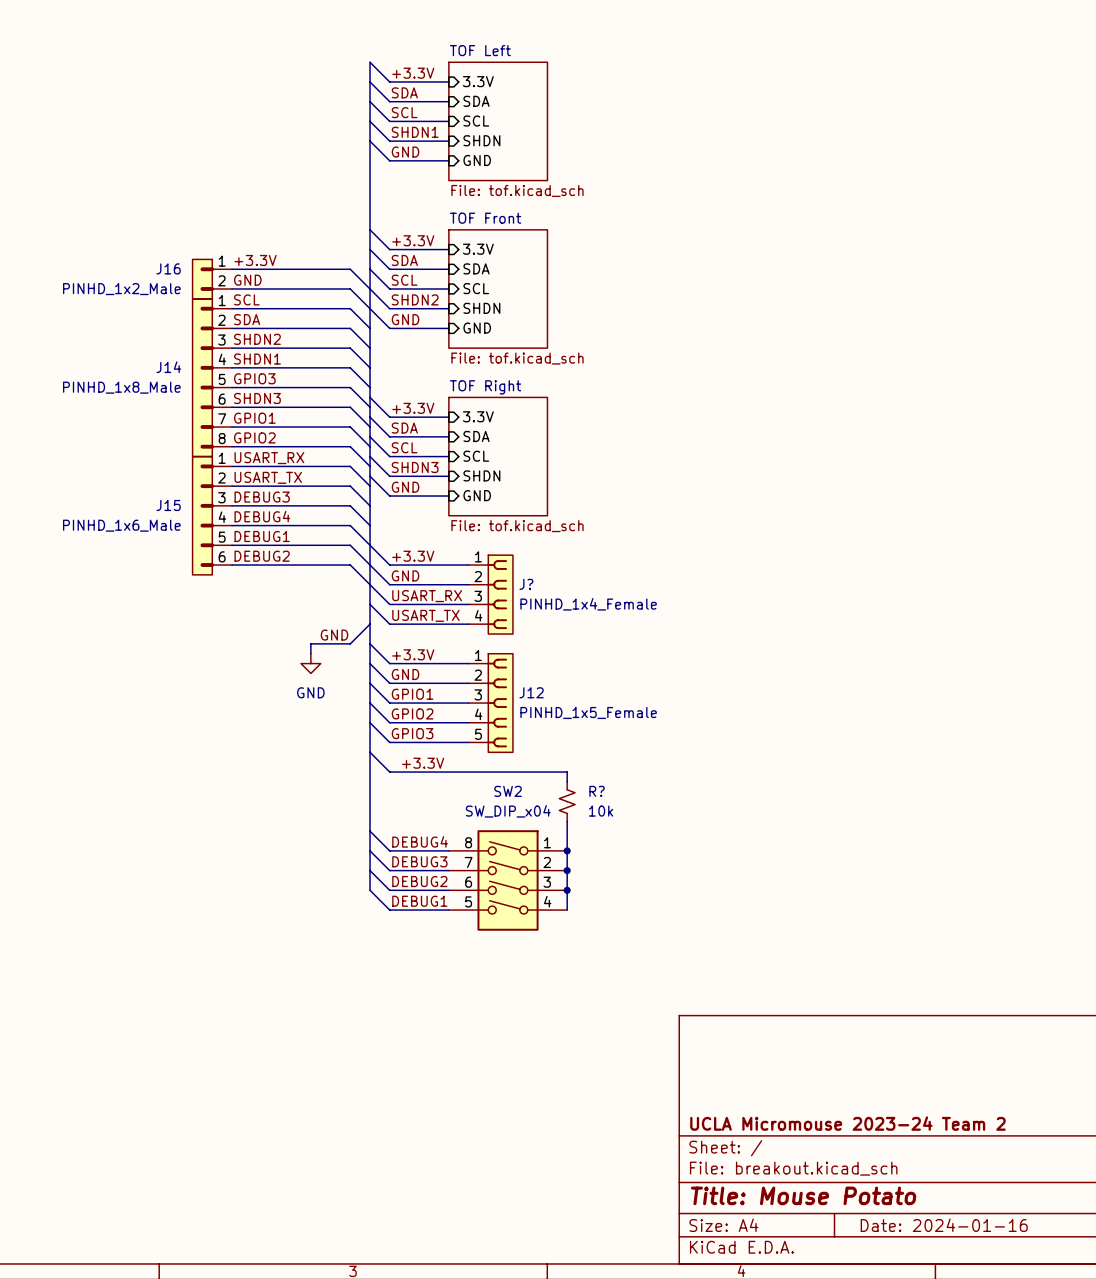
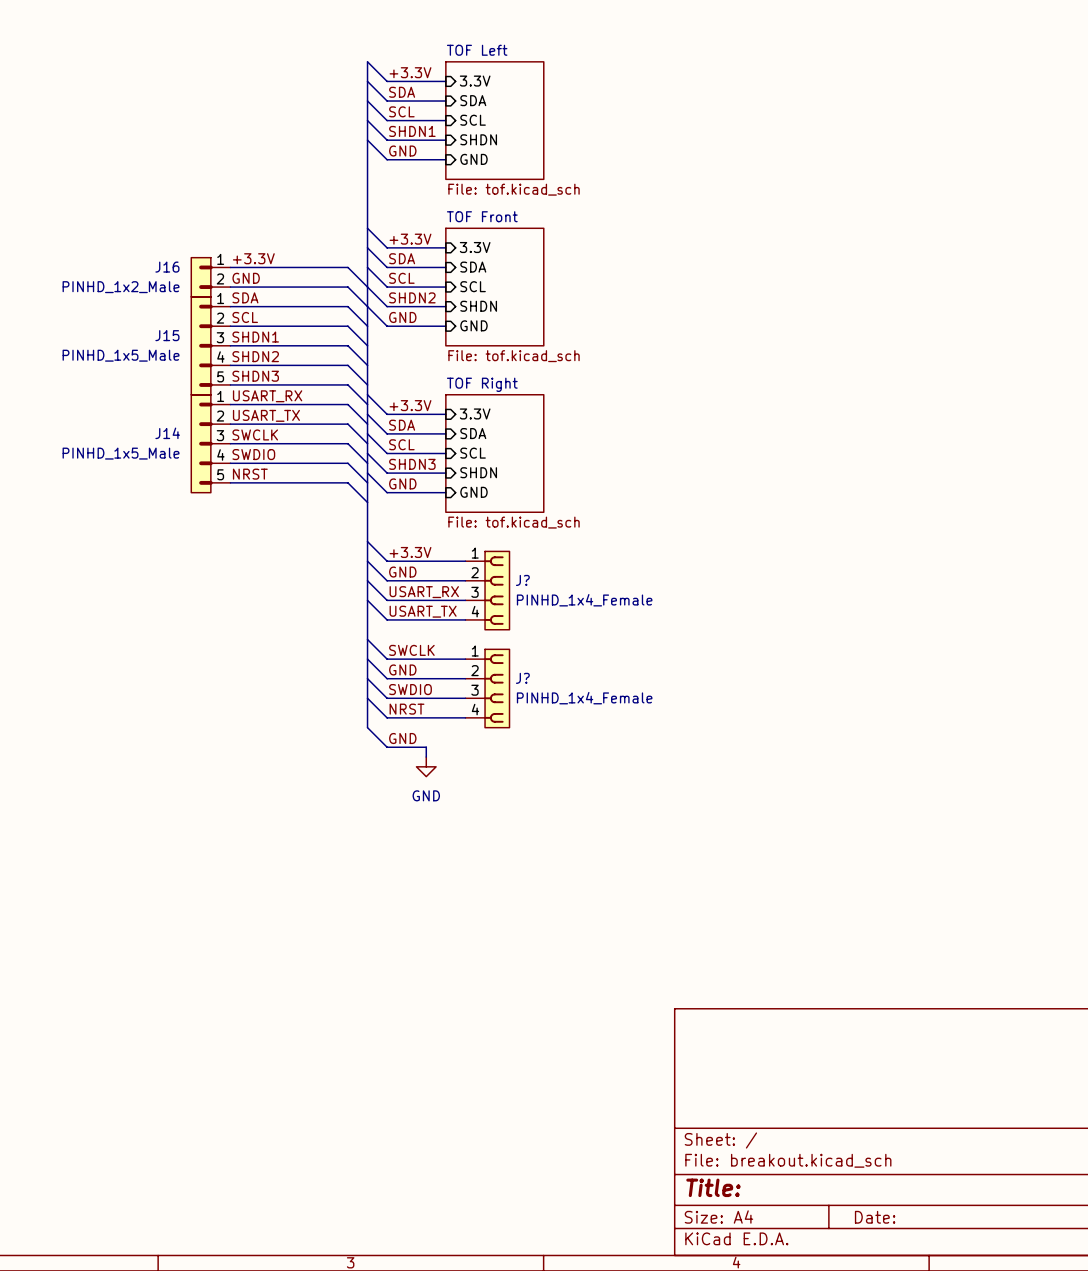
J14 symbol: [192, 298, 233, 457] -> [191, 394, 231, 493]
label: SCL (246, 299) -> SDA (245, 297)
label: SDA (247, 319) -> SCL (245, 317)
label: SHDN2 (257, 339) -> SHDN1 (255, 337)
label: SHDN1 (257, 359) -> SHDN2 (255, 356)
label: GPIO3 (254, 378) -> SHDN3 (255, 376)
J14 value: PINHD_1x8_Male (121, 387) -> PINHD_1x5_Male (121, 453)
label: SHDN3 (257, 398) -> USART_RX (267, 396)
label: GPIO1 (254, 418) -> USART_TX (266, 415)
label: GPIO2 (254, 437) -> SWCLK (255, 434)
J15 symbol: [192, 456, 233, 575] -> [191, 296, 231, 395]
label: USART_RX (269, 458) -> SWDIO (253, 454)
label: USART_TX (268, 477) -> NRST (250, 474)
label: DEBUG3 (262, 497) -> none
wire: (232, 505) (350, 505) (370, 525) -> none
label: DEBUG4 (262, 516) -> none
J15 value: PINHD_1x6_Male (121, 525) -> PINHD_1x5_Male (121, 355)
wire: (232, 525) (350, 525) (370, 545) -> none
label: DEBUG1 (262, 536) -> none
wire: (232, 545) (350, 545) (370, 565) -> none
label: DEBUG2 (262, 556) -> none
wire: (232, 565) (350, 565) (370, 584) -> none
wire: (370, 624) (350, 643) (310, 643) (310, 653) -> none
label position: GND (334, 635) -> GND (402, 738)
label: +3.3V (413, 654) -> SWCLK (411, 650)
power symbol position: GND (310, 663) -> GND (426, 766)
J?: none -> PINHD_1x4_Female (487, 688)
label: GPIO1 (412, 694) -> SWDIO (410, 689)
J12: PINHD_1x5_Female (490, 703) -> none
label: GPIO2 (412, 713) -> NRST (407, 709)
wire: (370, 722) (389, 742) (468, 742) -> none
wire: none -> (367, 727) (387, 747) (426, 747) (426, 757)
bus: (370, 732) (370, 890) -> none
label: GPIO3 (412, 733) -> none
wire: (370, 752) (389, 772) (567, 772) (567, 781) -> none
label: +3.3V (423, 763) -> none
R?: 10k (567, 801) -> none
wire: (567, 821) (567, 910) -> none
wire: (370, 831) (389, 850) (448, 850) -> none
label: DEBUG4 (420, 841) -> none
wire: (370, 850) (389, 870) (448, 870) -> none
junction: (567, 850) -> none
label: DEBUG3 (419, 861) -> none
wire: (370, 870) (389, 890) (448, 890) -> none
junction: (567, 870) -> none
SW2: SW_DIP_x04 (508, 880) -> none
label: DEBUG2 (419, 881) -> none
wire: (370, 890) (389, 910) (448, 910) -> none
junction: (567, 890) -> none
label: DEBUG1 (419, 901) -> none
title block: UCLA Micromouse 2023-24 Team 2 (847, 1123) -> none
title block: Title: Mouse Potato (803, 1195) -> Title: (713, 1187)
title block: Date: 2024-01-16 (944, 1225) -> Date: (875, 1217)

